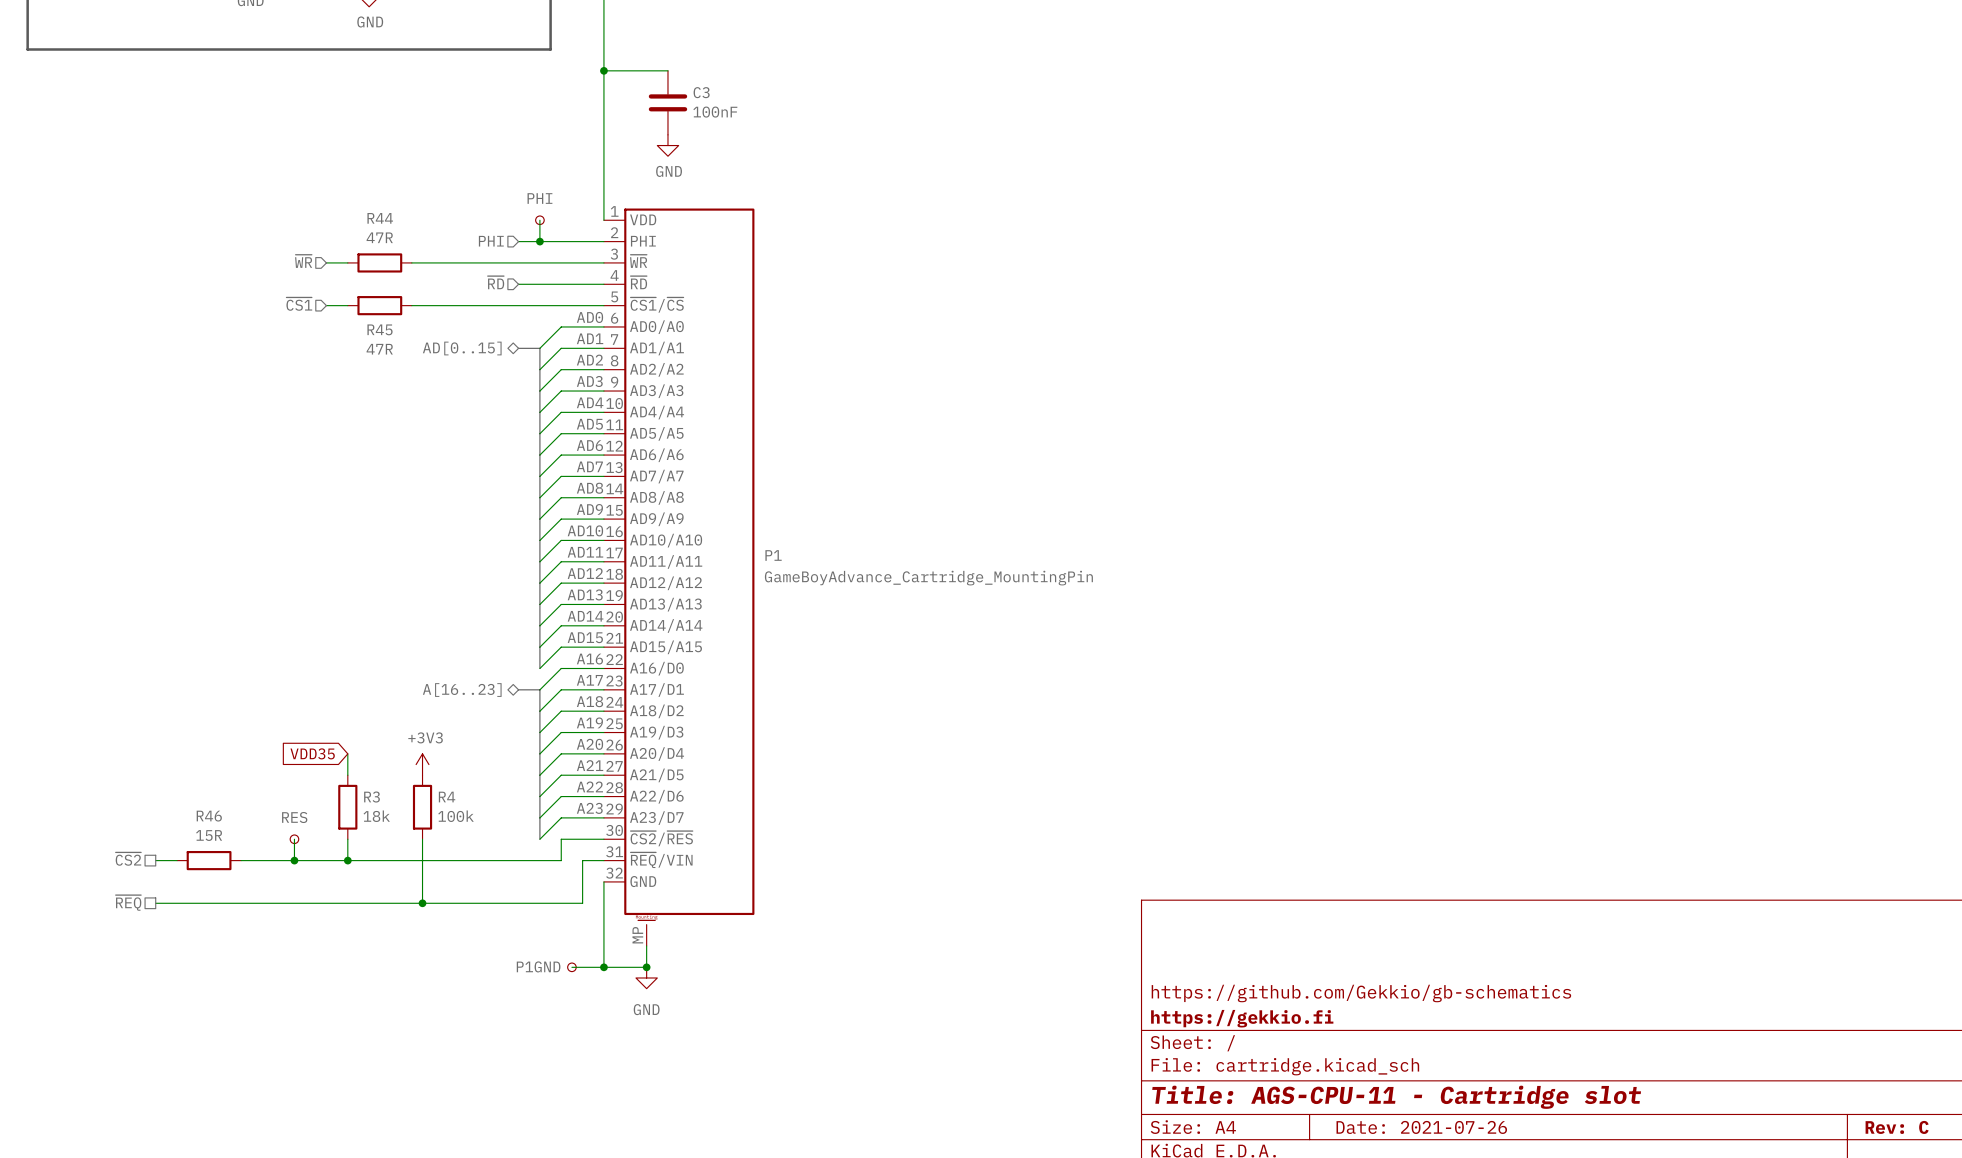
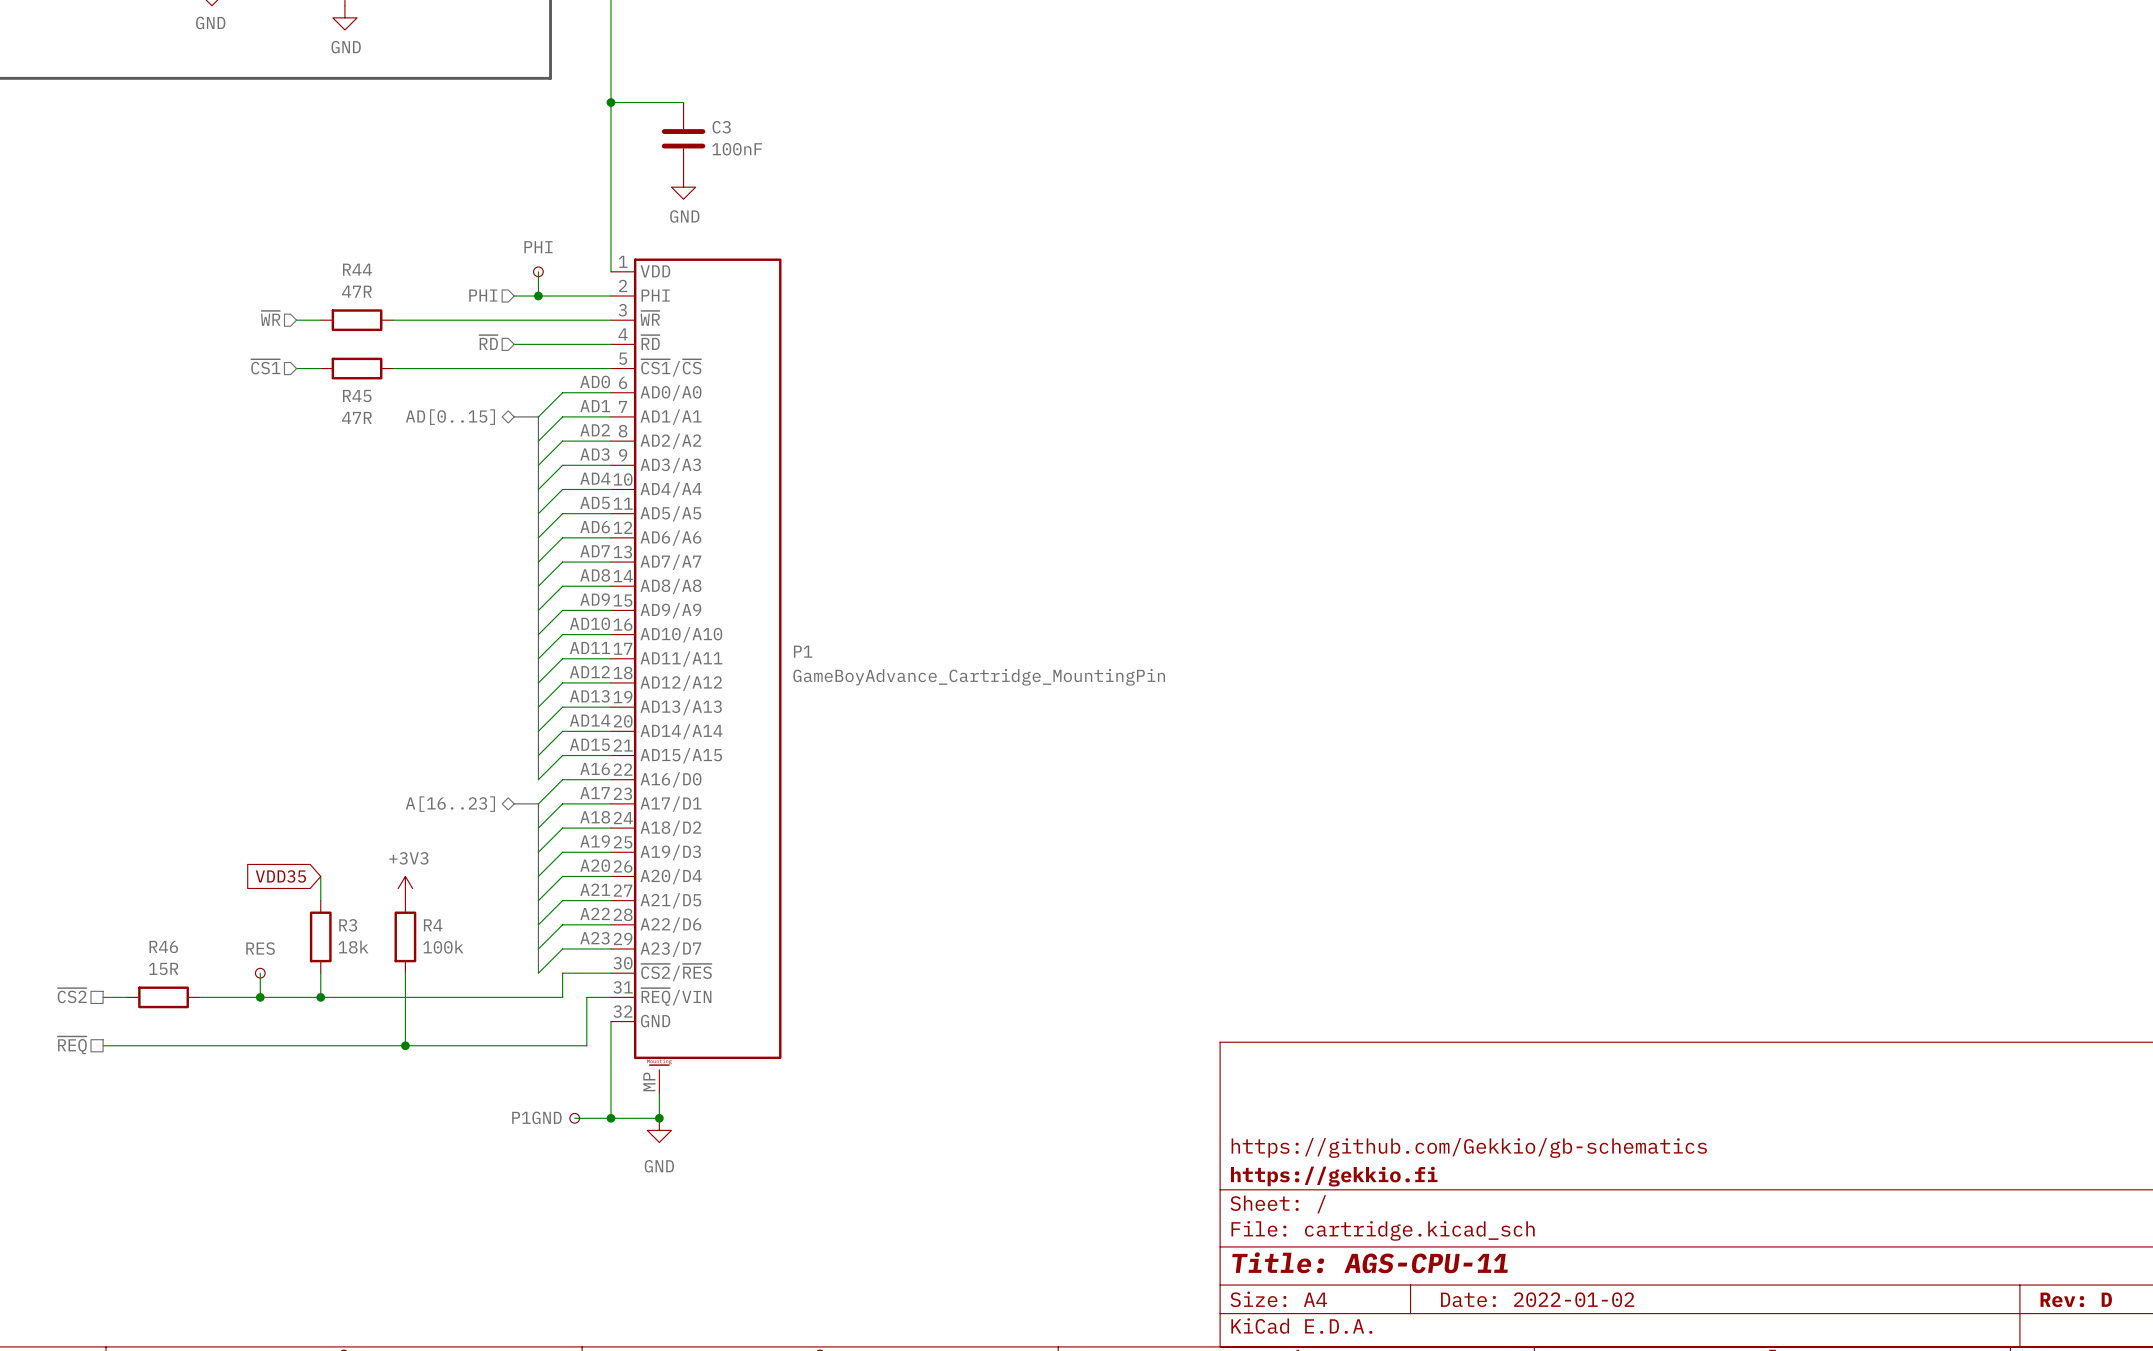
title block: Title: AGS-CPU-11 - Cartridge slot (1396, 1097) -> Title: AGS-CPU-11 (1370, 1262)
title block: Date: 2021-07-26 (1421, 1127) -> Date: 2022-01-02 (1537, 1299)
title block: Rev: C (1897, 1127) -> Rev: D (2076, 1299)

